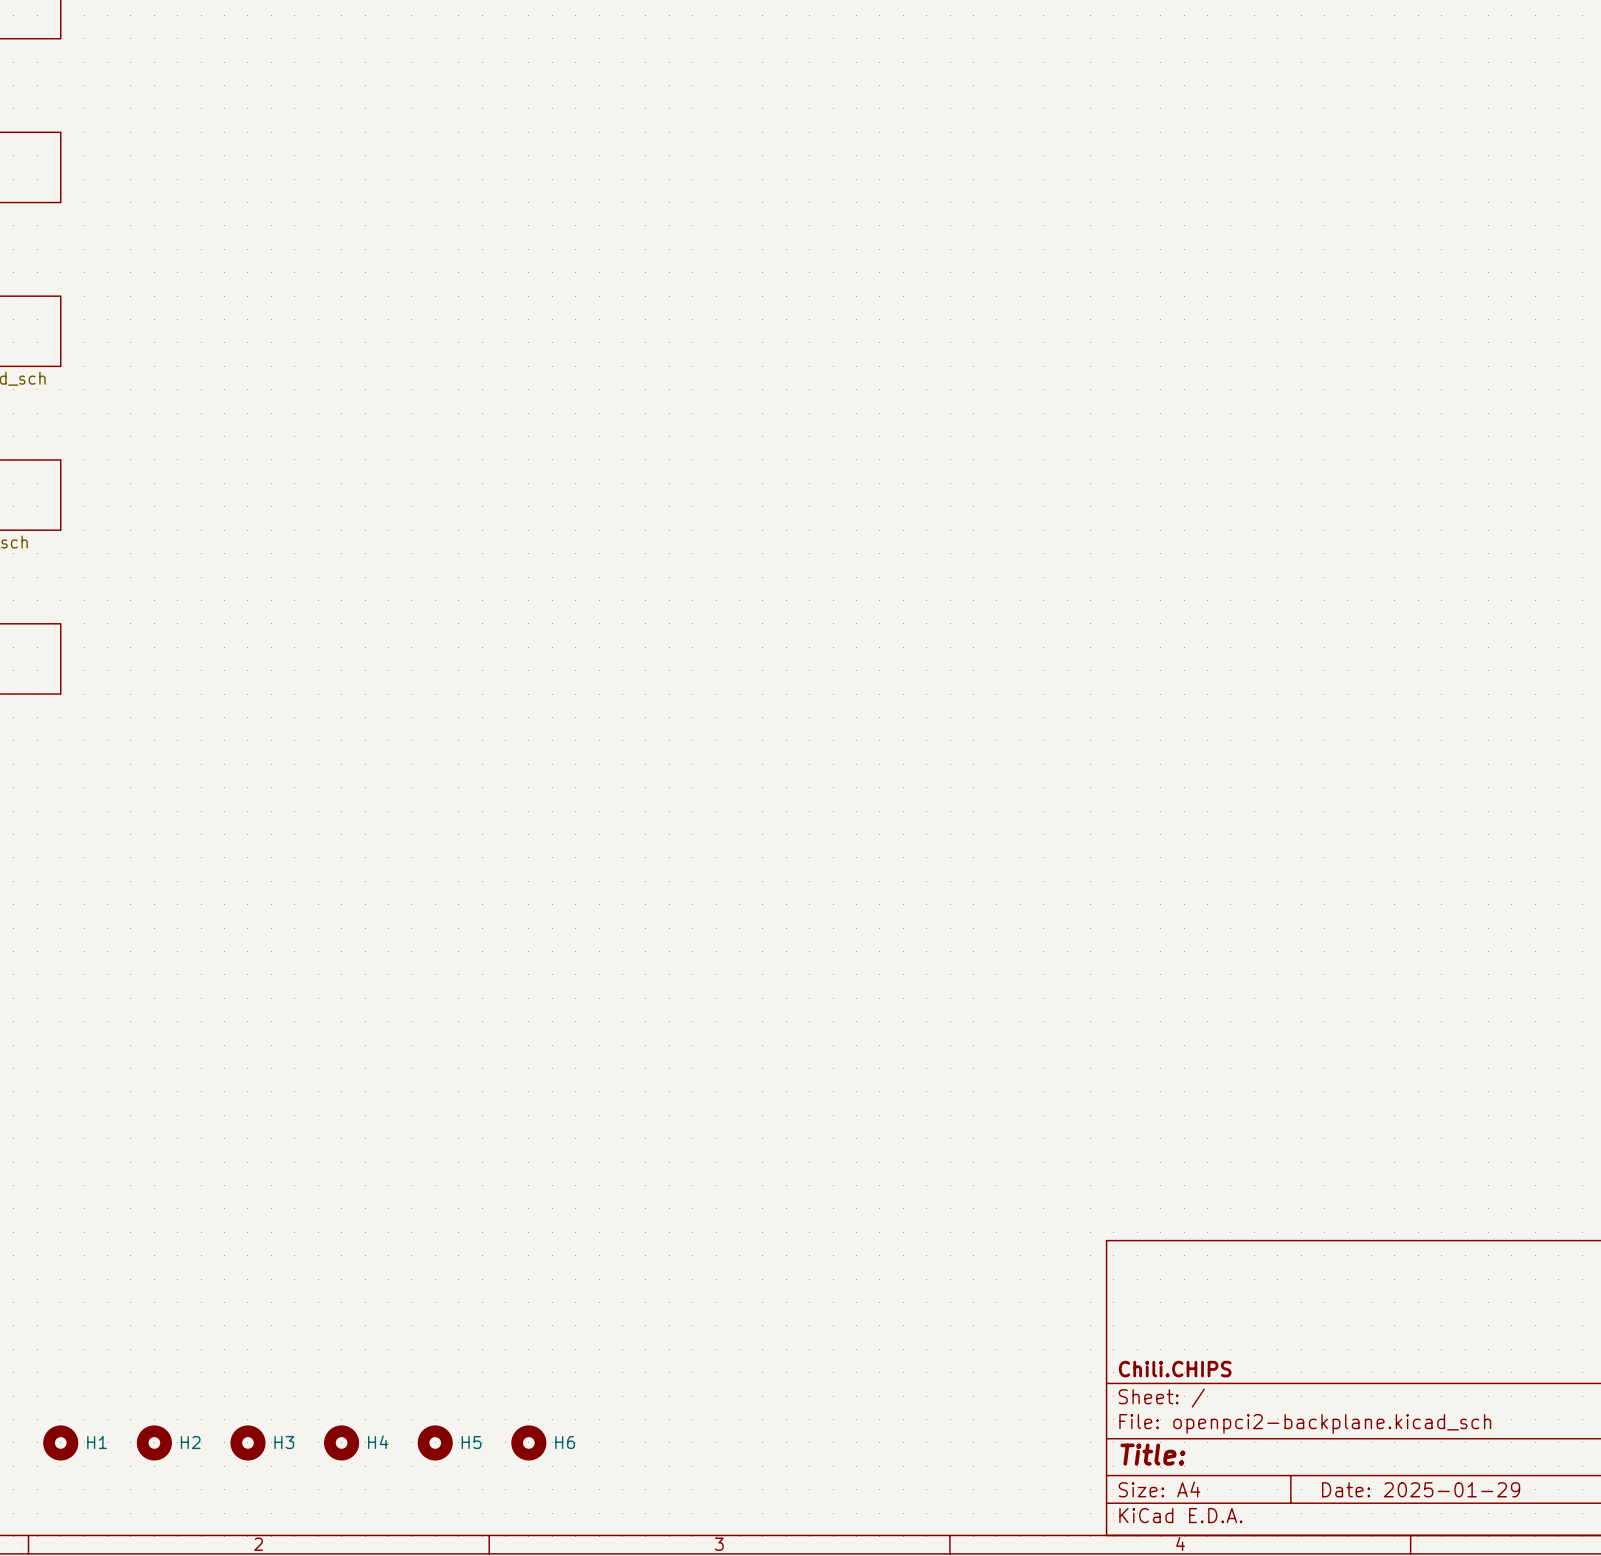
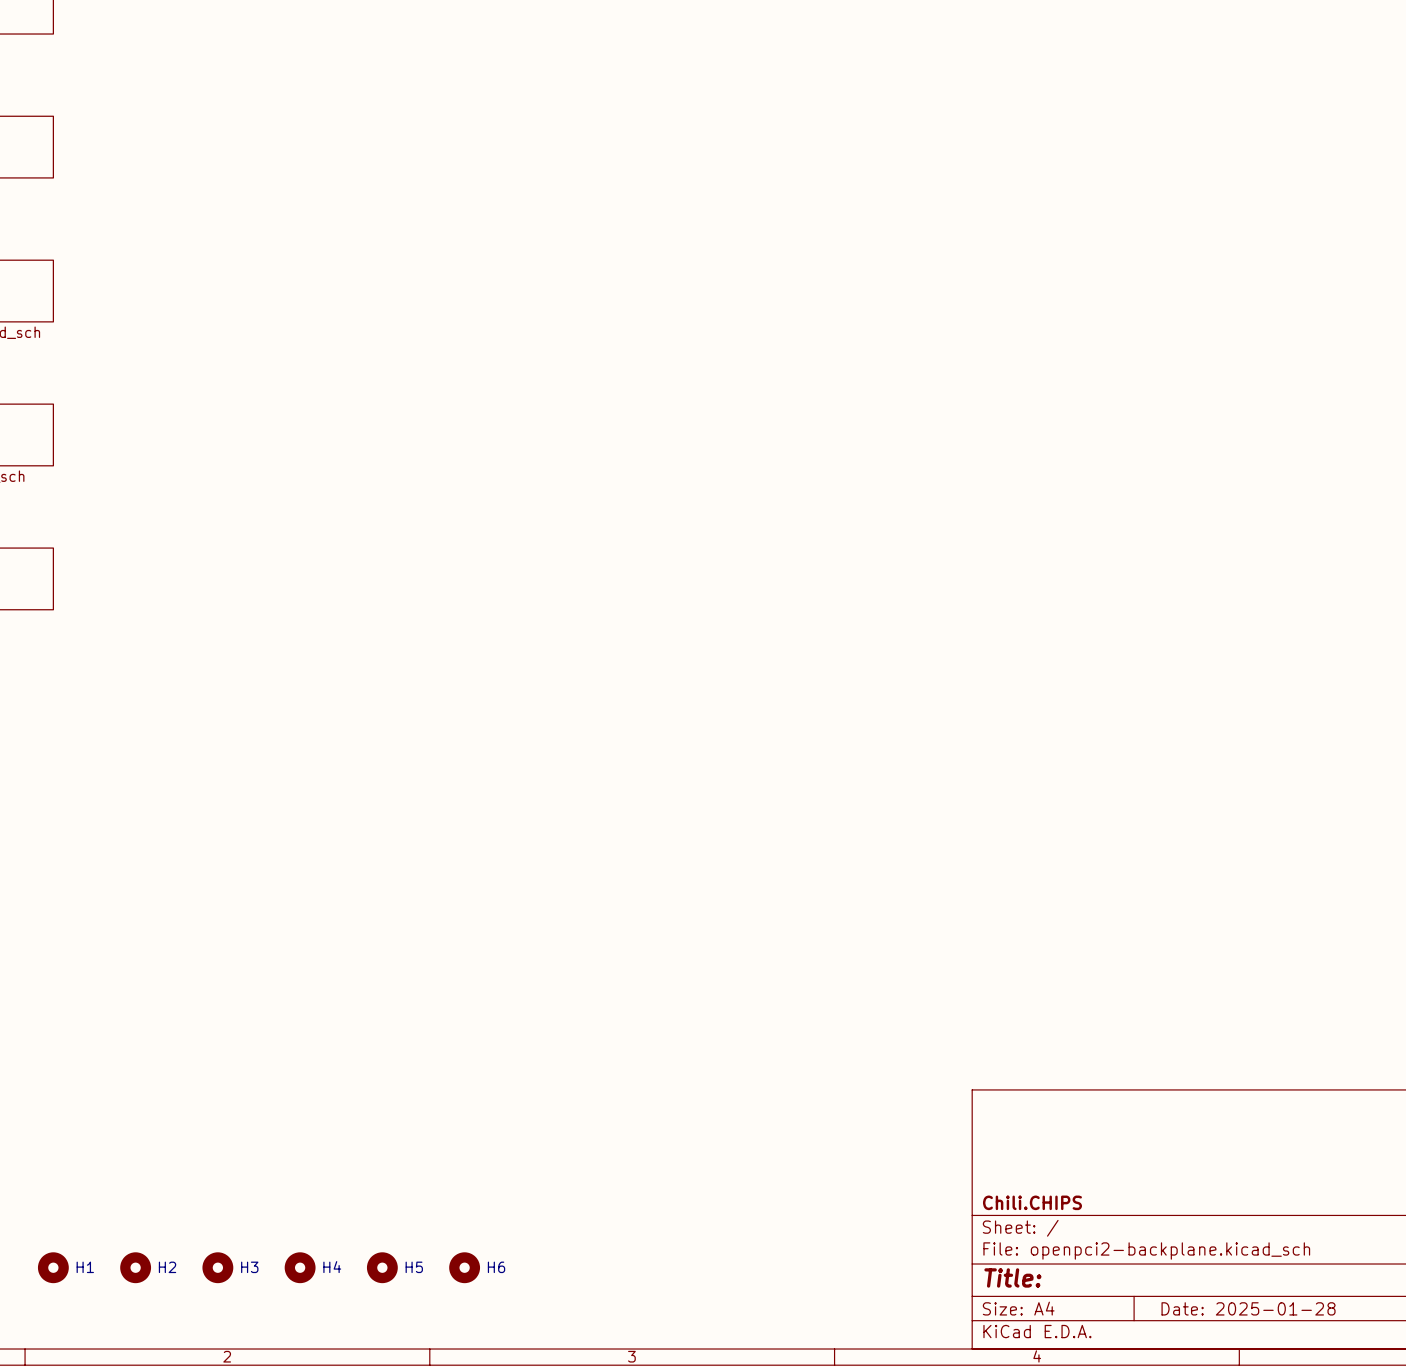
title block: Date: 2025-01-29 (1421, 1489) -> Date: 2025-01-28 (1248, 1308)

